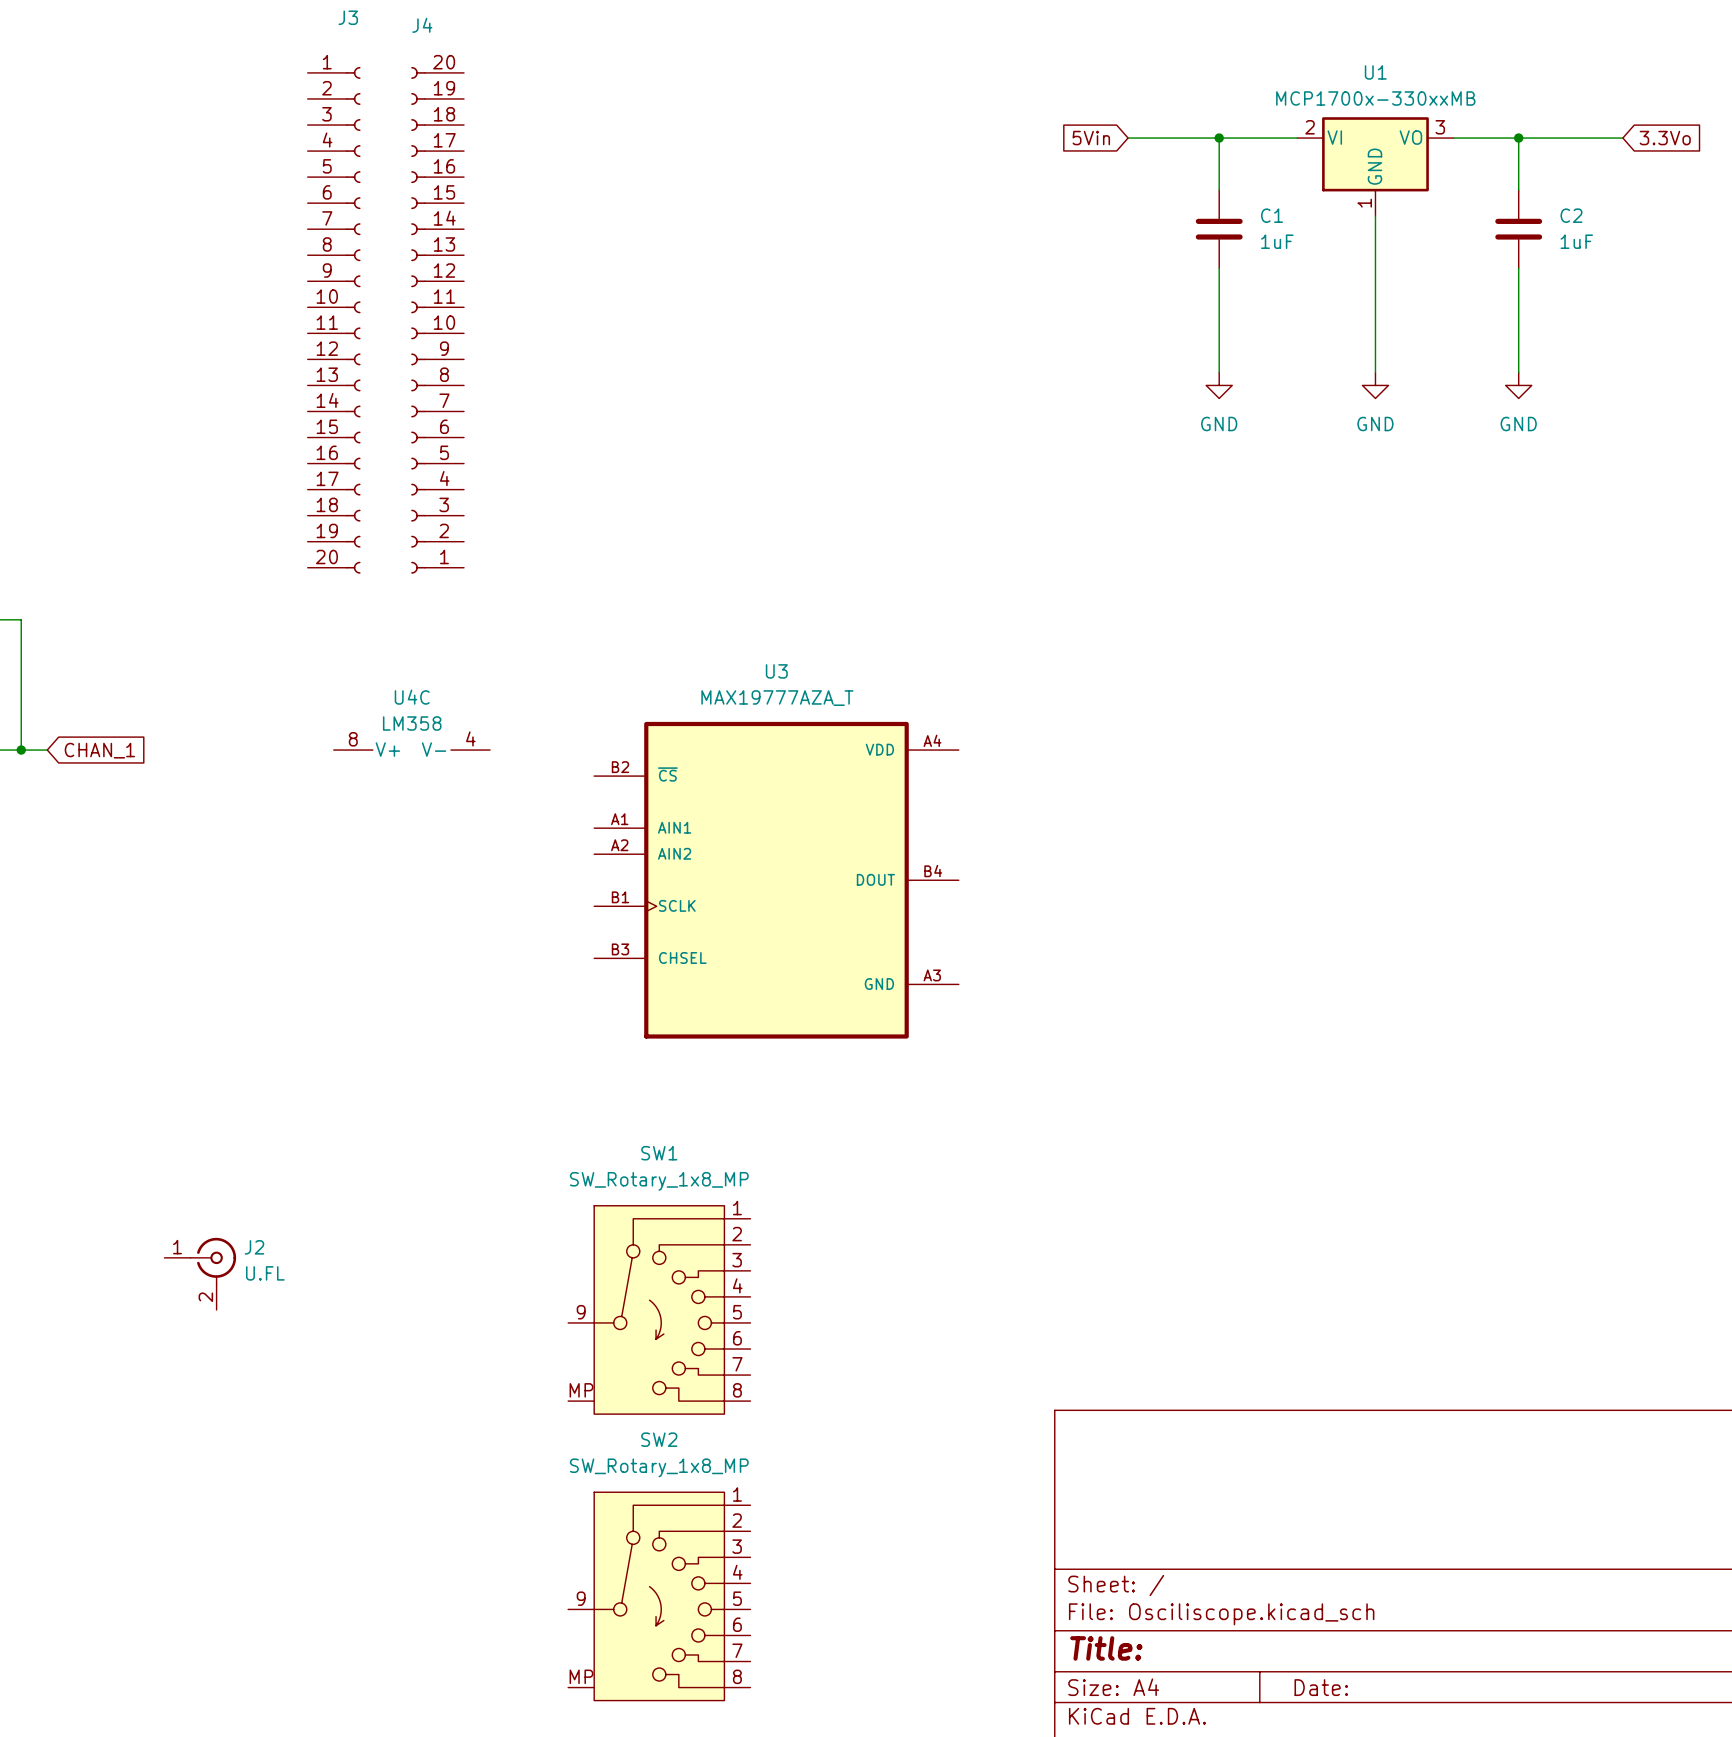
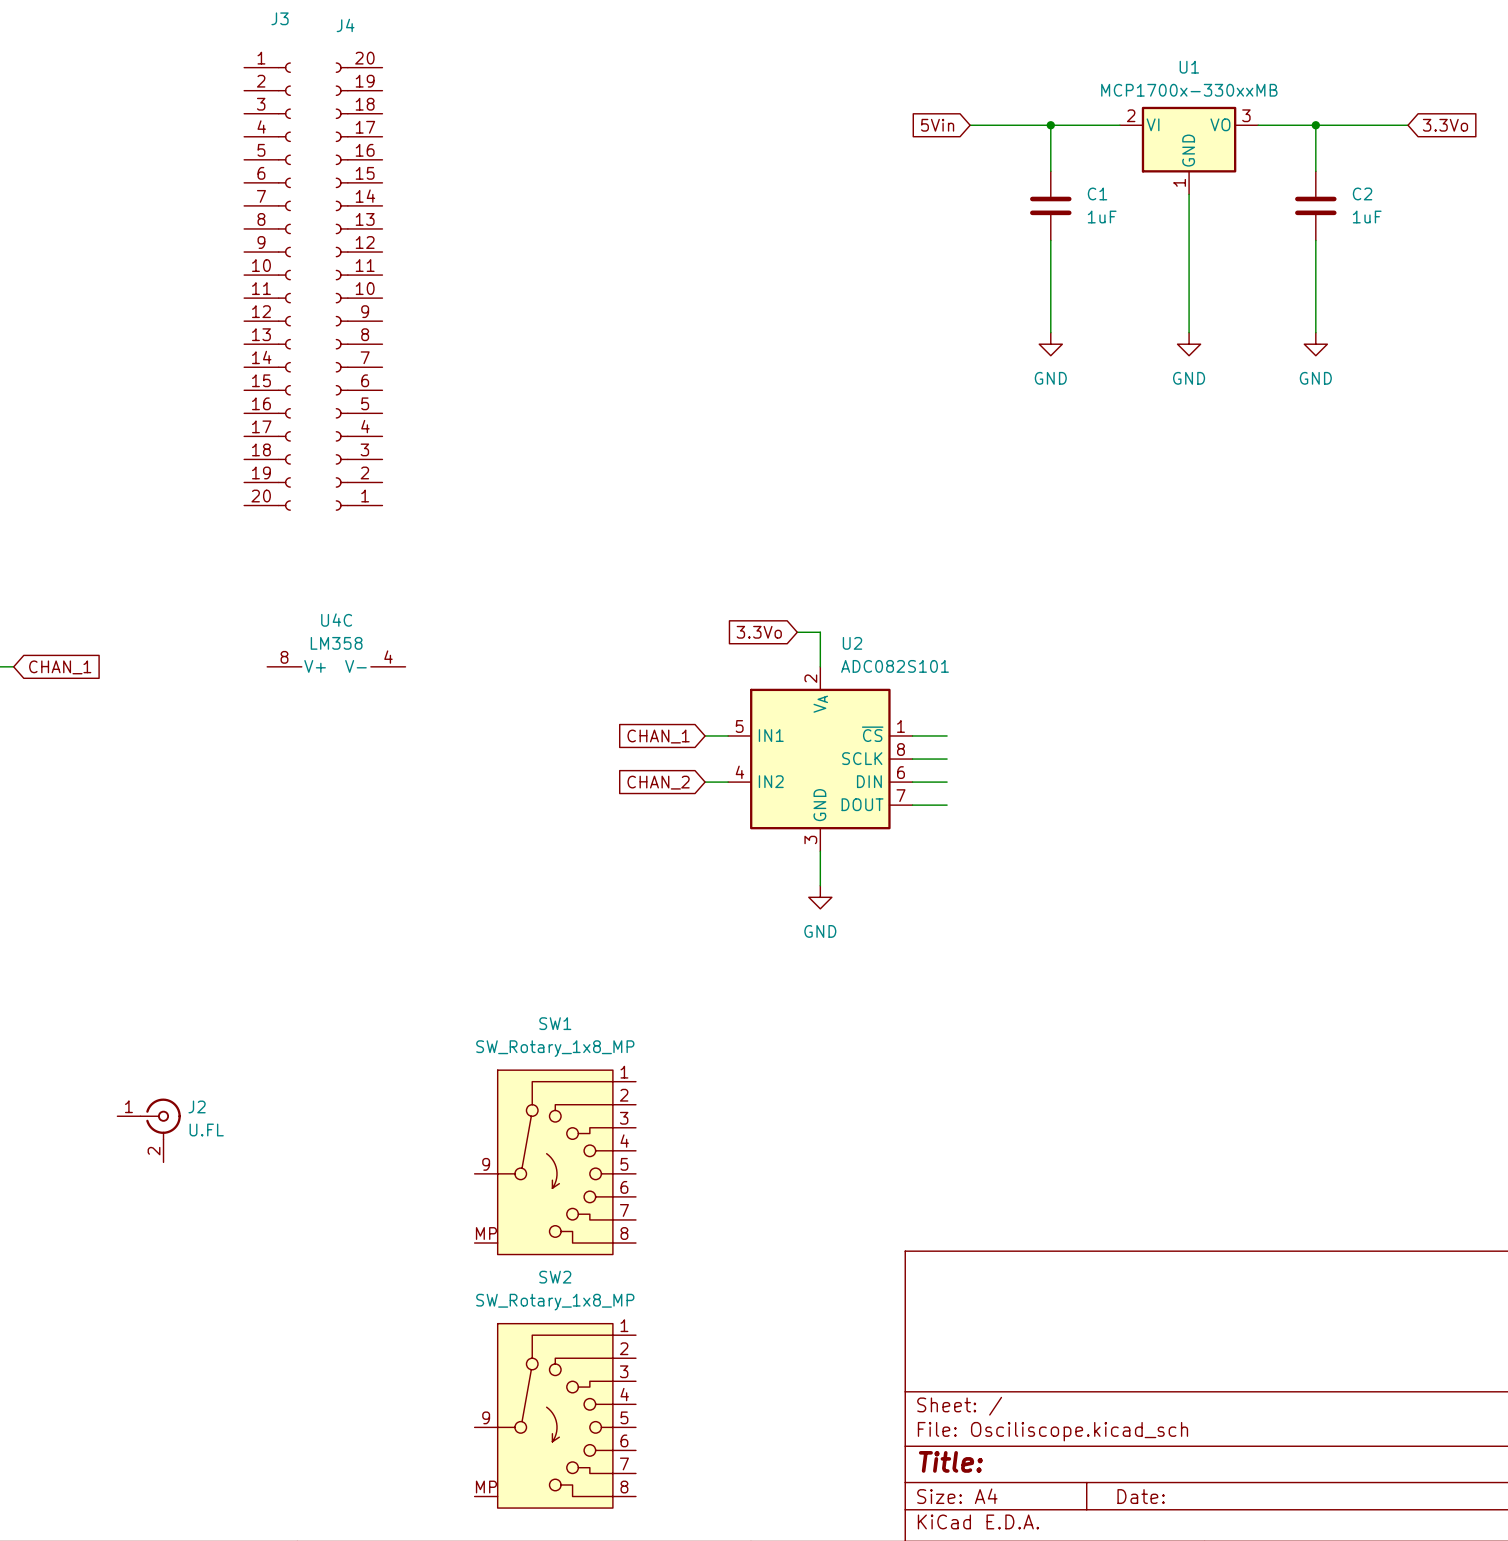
global label: none -> 3.3Vo (759, 632)
wire: none -> (797, 632) (820, 632) (820, 666)
global label: none -> CHAN_1 (658, 736)
wire: none -> (912, 735) (947, 735)
U2: none -> ADC082S101 (820, 759)
wire: none -> (912, 759) (947, 759)
U3: MAX19777AZA_T (776, 880) -> none
global label: none -> CHAN_2 (658, 782)
wire: none -> (912, 782) (947, 782)
wire: none -> (912, 805) (947, 805)
wire: none -> (820, 851) (820, 885)
power symbol: none -> GND (820, 897)

